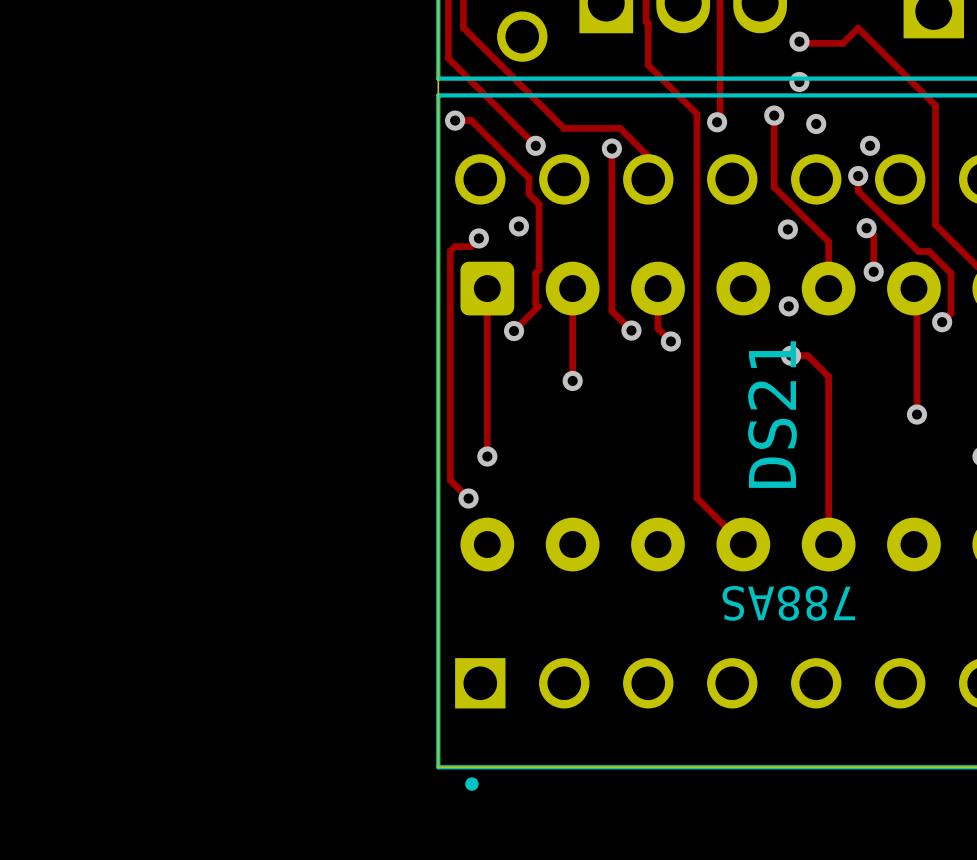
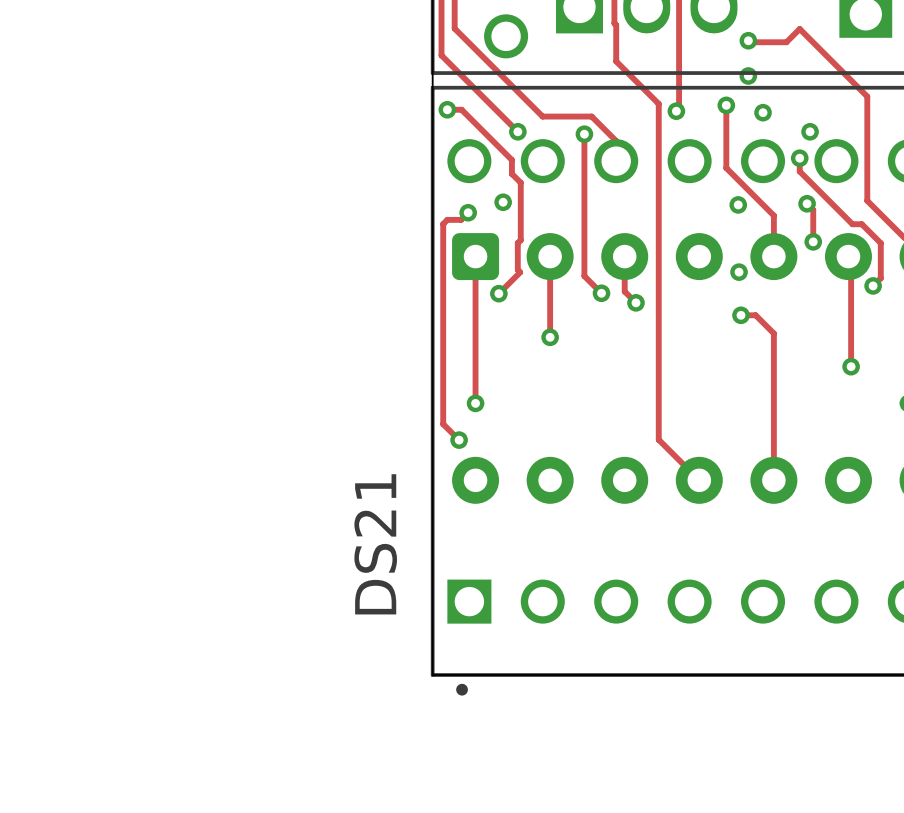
DS21 name position: DS21 (772, 414) -> DS21 (375, 544)
DS21 text: 788AS (788, 603) -> none

